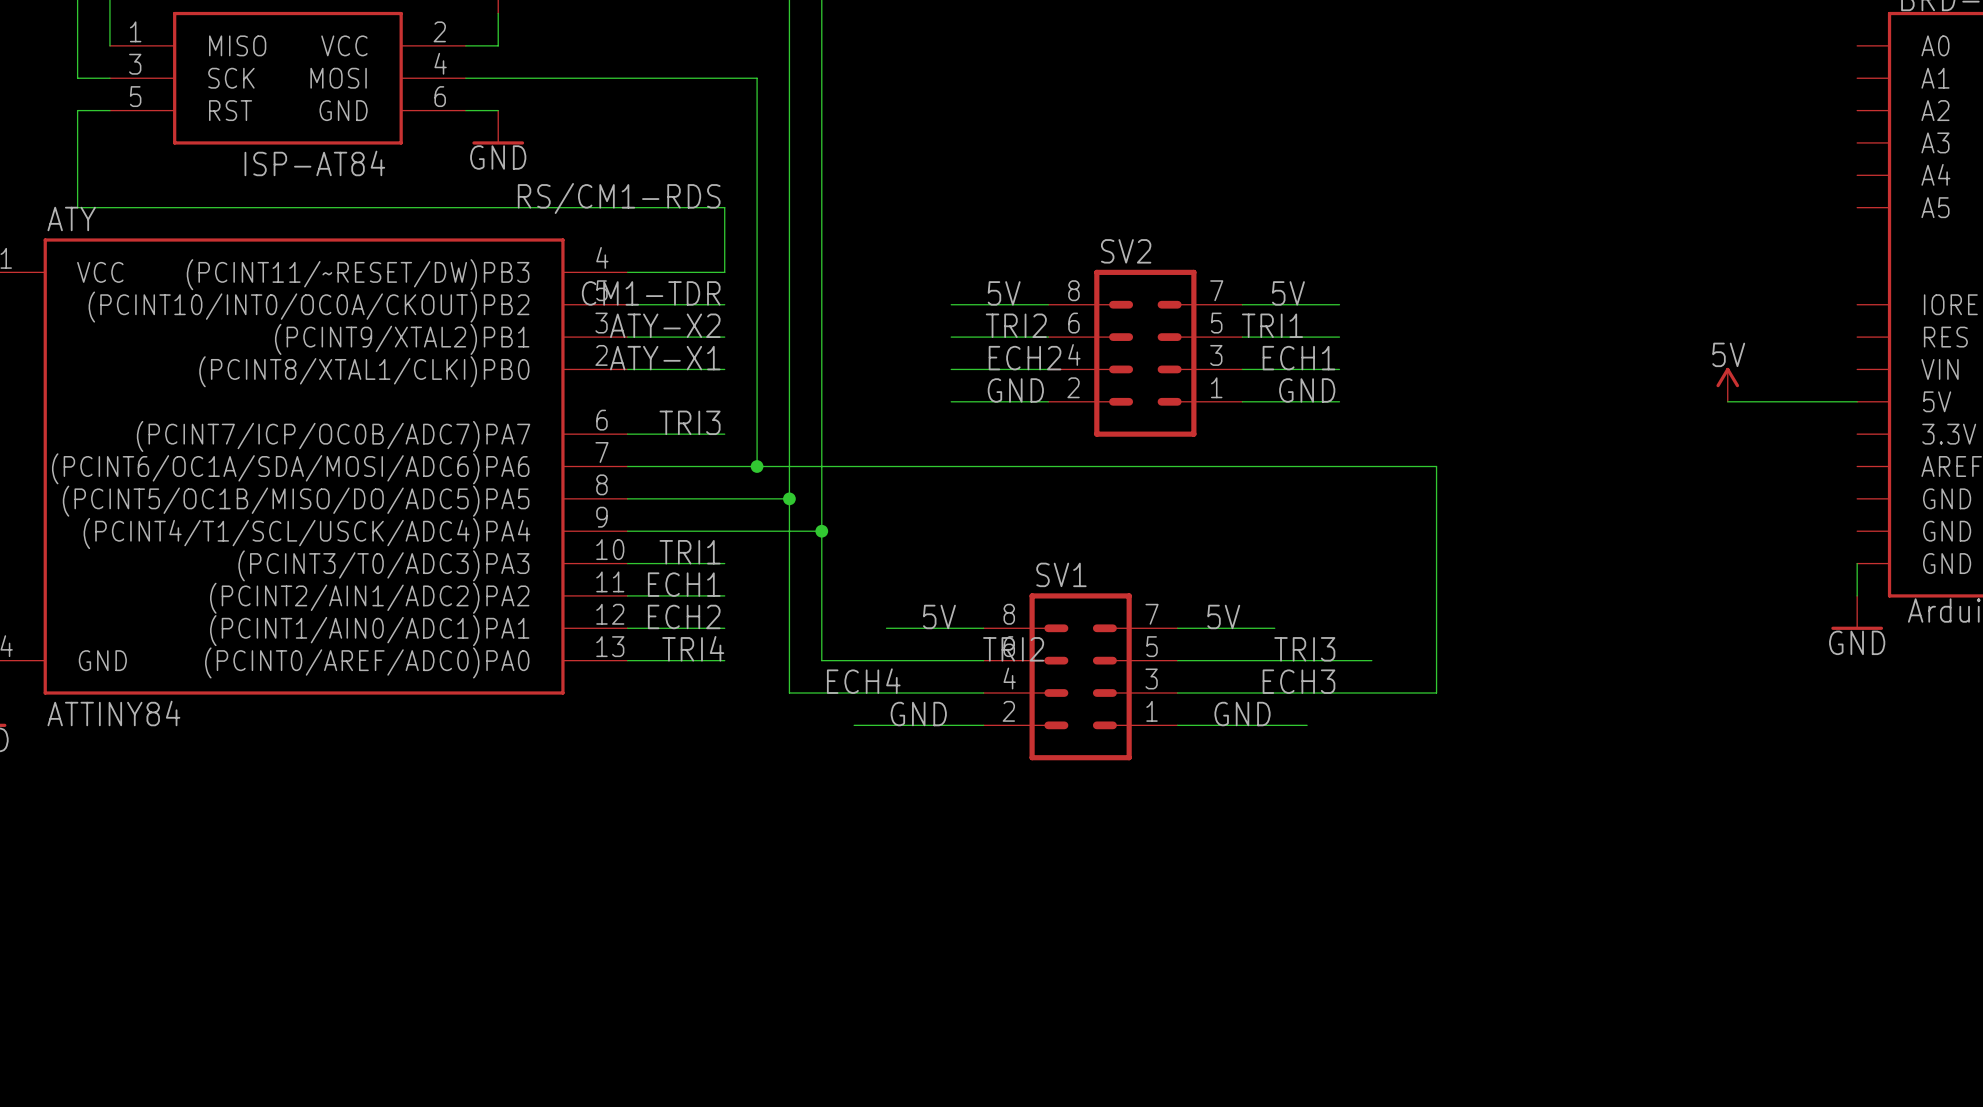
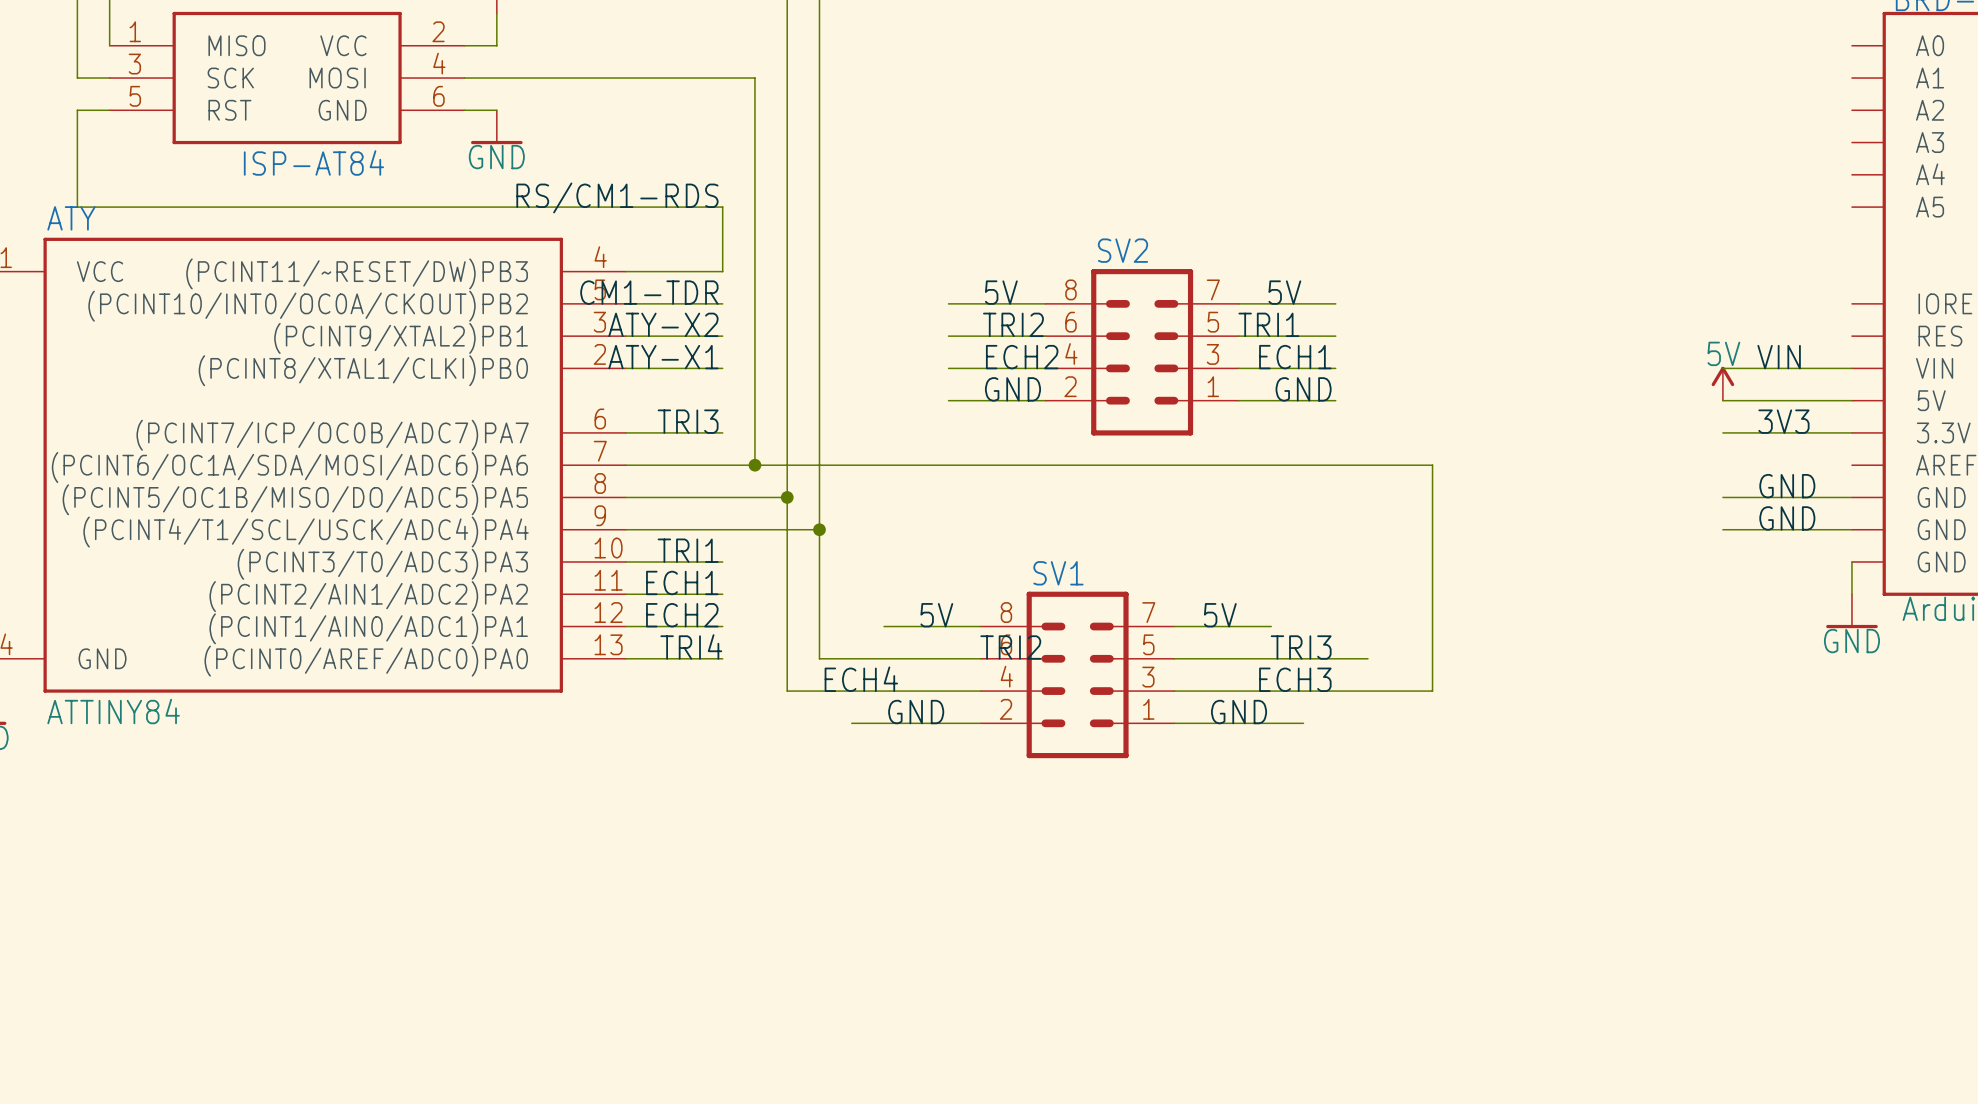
label: none -> VIN (1779, 357)
wire: none -> (1722, 368) (1851, 368)
label: none -> 3V3 (1783, 421)
wire: none -> (1722, 432) (1851, 432)
label: none -> GND (1787, 486)
wire: none -> (1722, 497) (1851, 497)
label: none -> GND (1787, 518)
wire: none -> (1722, 529) (1851, 529)

